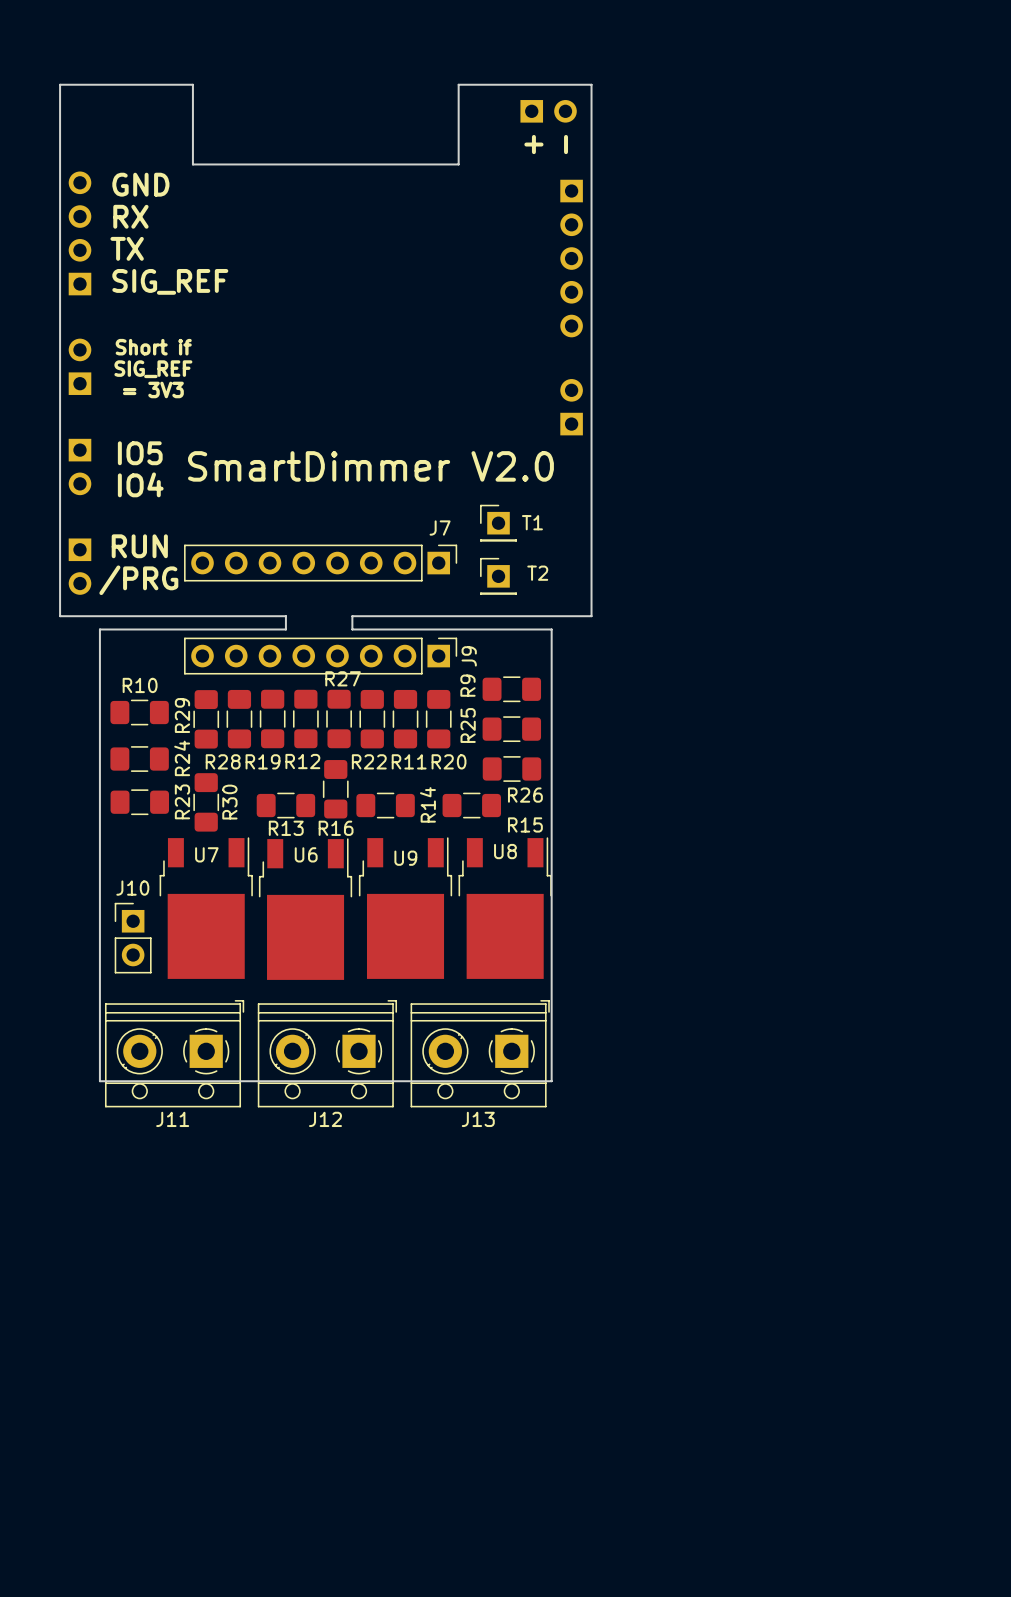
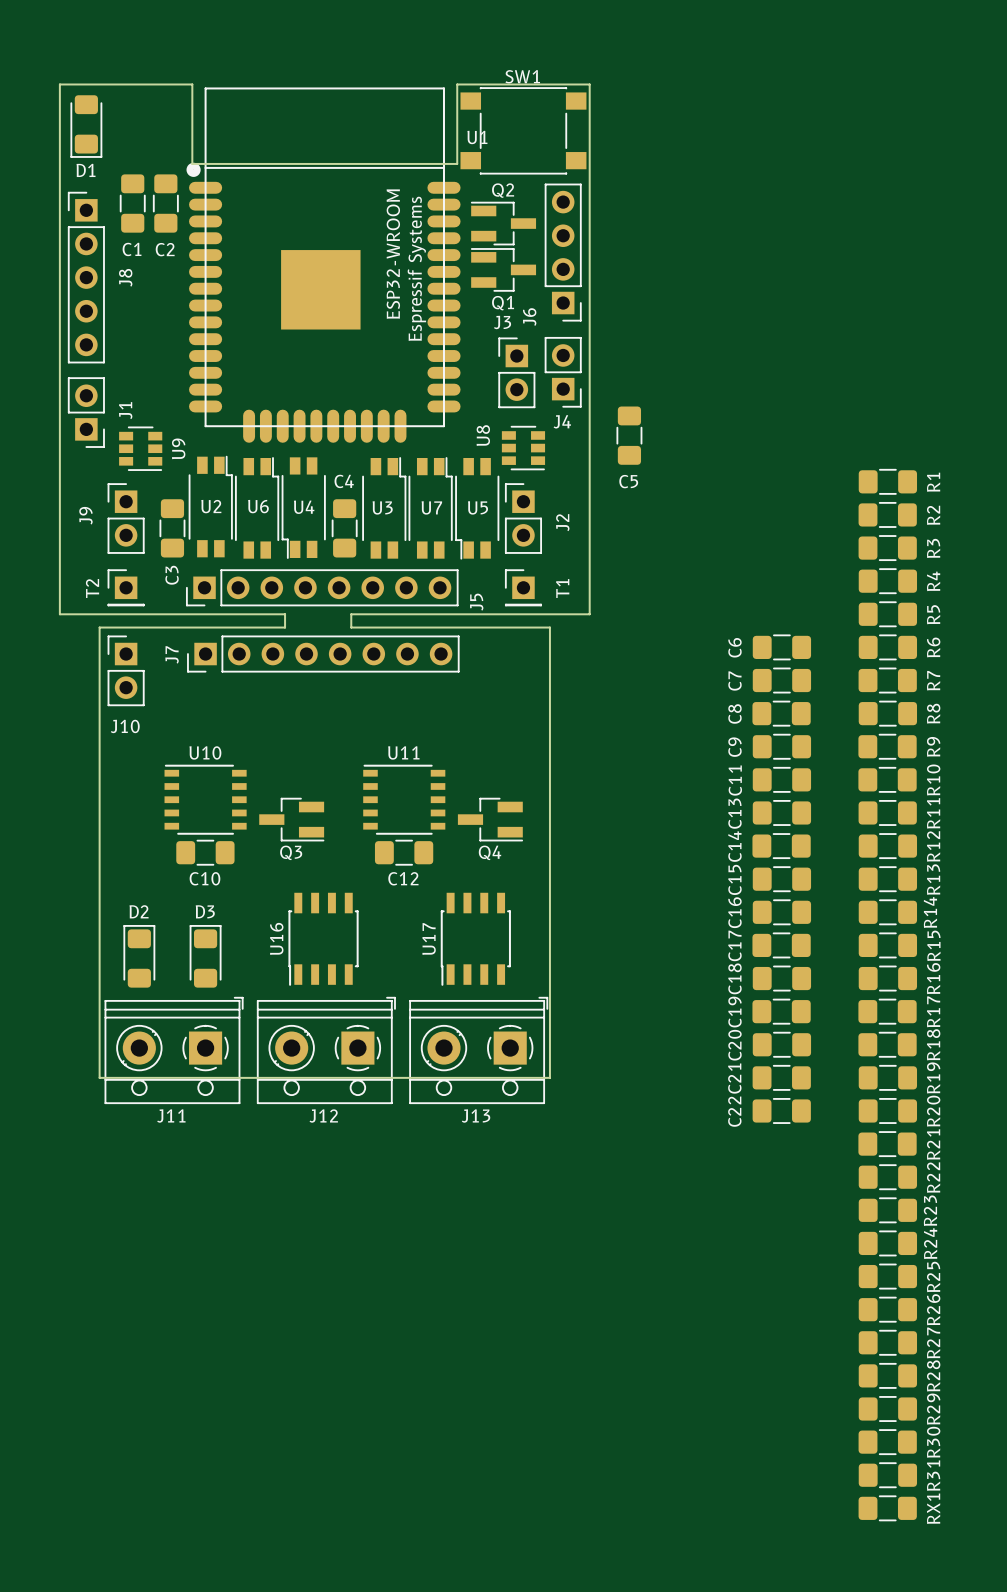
part: (548, 111) -> none
D1: none -> (86, 126)
SW1: none -> (523, 130)
text: + (533, 144) -> none
text: - (566, 144) -> none
text: GND (140, 184) -> none
C1: none -> (132, 203)
C2: none -> (165, 203)
text: RX (130, 216) -> none
Q2: none -> (503, 223)
part: (80, 233) -> none
text: TX (127, 248) -> none
J6: none -> (563, 252)
part: (571, 258) -> none
U1: none -> (323, 265)
Q1: none -> (503, 269)
J8: none -> (86, 277)
text: SIG_REF (170, 281) -> none
text: Short if (153, 347) -> none
part: (80, 366) -> none
text: SIG_REF (153, 369) -> none
J3: none -> (516, 372)
J4: none -> (563, 372)
text: = 3V3 (153, 389) -> none
part: (571, 407) -> none
J1: none -> (86, 412)
C5: none -> (629, 435)
text: IO5 (140, 453) -> none
part: (80, 466) -> none
text: SmartDimmer V2.0 (370, 466) -> none
R1: none -> (887, 481)
text: IO4 (140, 484) -> none
U2: none -> (210, 506)
U4: none -> (303, 508)
U3: none -> (384, 507)
U5: none -> (477, 508)
R2: none -> (887, 514)
J2: none -> (523, 518)
T1 name rotation: 0° (532, 522) -> 90° counterclockwise (562, 588)
T1 position: (498, 523) -> (523, 587)
J7 name position: J7 (440, 528) -> J7 (172, 654)
C3: none -> (172, 528)
C4: none -> (344, 528)
text: RUN (139, 546) -> none
R3: none -> (887, 548)
J7 rotation: 0° (320, 563) -> 180° (323, 654)
part: (80, 566) -> none
T2 name rotation: 0° (537, 573) -> 90° counterclockwise (92, 588)
T2 name position: T2 (537, 573) -> T2 (92, 588)
T2 position: (498, 576) -> (126, 587)
text: /PRG (138, 580) -> none
R4: none -> (887, 581)
J5: none -> (322, 587)
R5: none -> (887, 614)
J9 footprint: [184, 637, 458, 675] -> [107, 483, 145, 554]
C6: none -> (781, 647)
R6: none -> (887, 647)
J9 name position: J9 (469, 656) -> J9 (85, 515)
C7: none -> (781, 680)
R7: none -> (887, 680)
R10 name rotation: 0° (140, 685) -> 90° counterclockwise (933, 780)
R10 name position: R10 (140, 685) -> R10 (933, 780)
R9 name position: R9 (467, 685) -> R9 (933, 746)
R9 position: (511, 689) -> (887, 746)
R10 position: (139, 712) -> (887, 779)
R29 name position: R29 (182, 715) -> R29 (933, 1409)
C8: none -> (781, 713)
R8: none -> (887, 713)
R29 rotation: 0° (206, 719) -> 90° clockwise (887, 1409)
R29 position: (206, 719) -> (887, 1409)
R28 rotation: 0° (239, 719) -> 90° clockwise (887, 1375)
R28 position: (239, 719) -> (887, 1375)
R19 rotation: 0° (272, 719) -> 90° clockwise (887, 1077)
R19 position: (272, 719) -> (887, 1077)
R12 rotation: 0° (305, 719) -> 90° clockwise (887, 846)
R12 position: (305, 719) -> (887, 846)
R27 rotation: 0° (339, 719) -> 90° clockwise (887, 1342)
R27 position: (339, 719) -> (887, 1342)
R22 rotation: 0° (372, 719) -> 90° clockwise (887, 1177)
R22 position: (372, 719) -> (887, 1177)
R11 rotation: 0° (405, 719) -> 90° clockwise (887, 812)
R11 position: (405, 719) -> (887, 812)
R20 rotation: 0° (438, 719) -> 90° clockwise (887, 1110)
R20 position: (438, 719) -> (887, 1110)
R25 name position: R25 (468, 725) -> R25 (933, 1276)
R25 position: (511, 729) -> (887, 1276)
C9: none -> (781, 746)
R24 position: (139, 759) -> (887, 1243)
R28 name position: R28 (223, 761) -> R28 (933, 1375)
R19 name position: R19 (263, 761) -> R19 (933, 1077)
R12 name position: R12 (302, 761) -> R12 (933, 846)
R22 name position: R22 (369, 761) -> R22 (933, 1177)
R11 name position: R11 (409, 761) -> R11 (933, 813)
R20 name position: R20 (449, 761) -> R20 (933, 1111)
R26 position: (511, 768) -> (887, 1309)
C11: none -> (781, 779)
R16 rotation: 0° (335, 789) -> 90° clockwise (887, 978)
R16 position: (335, 789) -> (887, 978)
R26 name rotation: 0° (525, 795) -> 90° counterclockwise (933, 1309)
R23 position: (139, 802) -> (887, 1210)
R30 rotation: 0° (206, 802) -> 90° clockwise (887, 1442)
R30 position: (206, 802) -> (887, 1442)
U10: none -> (205, 799)
U11: none -> (404, 799)
R13 position: (285, 805) -> (887, 879)
R14 position: (385, 805) -> (887, 912)
R15 position: (471, 805) -> (887, 945)
C13: none -> (781, 812)
Q3: none -> (291, 819)
Q4: none -> (490, 819)
R15 name rotation: 0° (525, 824) -> 90° counterclockwise (933, 945)
R13 name rotation: 0° (286, 828) -> 90° counterclockwise (933, 879)
R13 name position: R13 (286, 828) -> R13 (933, 879)
R16 name position: R16 (336, 828) -> R16 (933, 978)
U7 footprint: [159, 837, 253, 979] -> [408, 457, 453, 559]
U9 footprint: [358, 837, 453, 979] -> [119, 426, 163, 471]
U8 footprint: [458, 837, 552, 979] -> [501, 425, 546, 471]
U6 footprint: [258, 838, 353, 980] -> [235, 457, 280, 559]
C14: none -> (781, 846)
U8 name position: U8 (505, 851) -> U8 (483, 435)
U7 name position: U7 (206, 854) -> U7 (431, 507)
U6 name position: U6 (306, 854) -> U6 (258, 506)
C10: none -> (205, 852)
C12: none -> (404, 852)
U9 name position: U9 (405, 858) -> U9 (178, 448)
C15: none -> (781, 879)
J10 name position: J10 (132, 888) -> J10 (125, 726)
C16: none -> (781, 912)
J10 position: (133, 938) -> (126, 670)
U16: none -> (323, 939)
U17: none -> (475, 939)
C17: none -> (781, 945)
D2: none -> (139, 956)
D3: none -> (205, 956)
C18: none -> (781, 978)
C19: none -> (781, 1011)
R17: none -> (887, 1011)
C20: none -> (781, 1044)
R18: none -> (887, 1044)
C21: none -> (781, 1077)
C22: none -> (781, 1110)
R21: none -> (887, 1144)
R31: none -> (887, 1475)
RX1: none -> (887, 1508)

